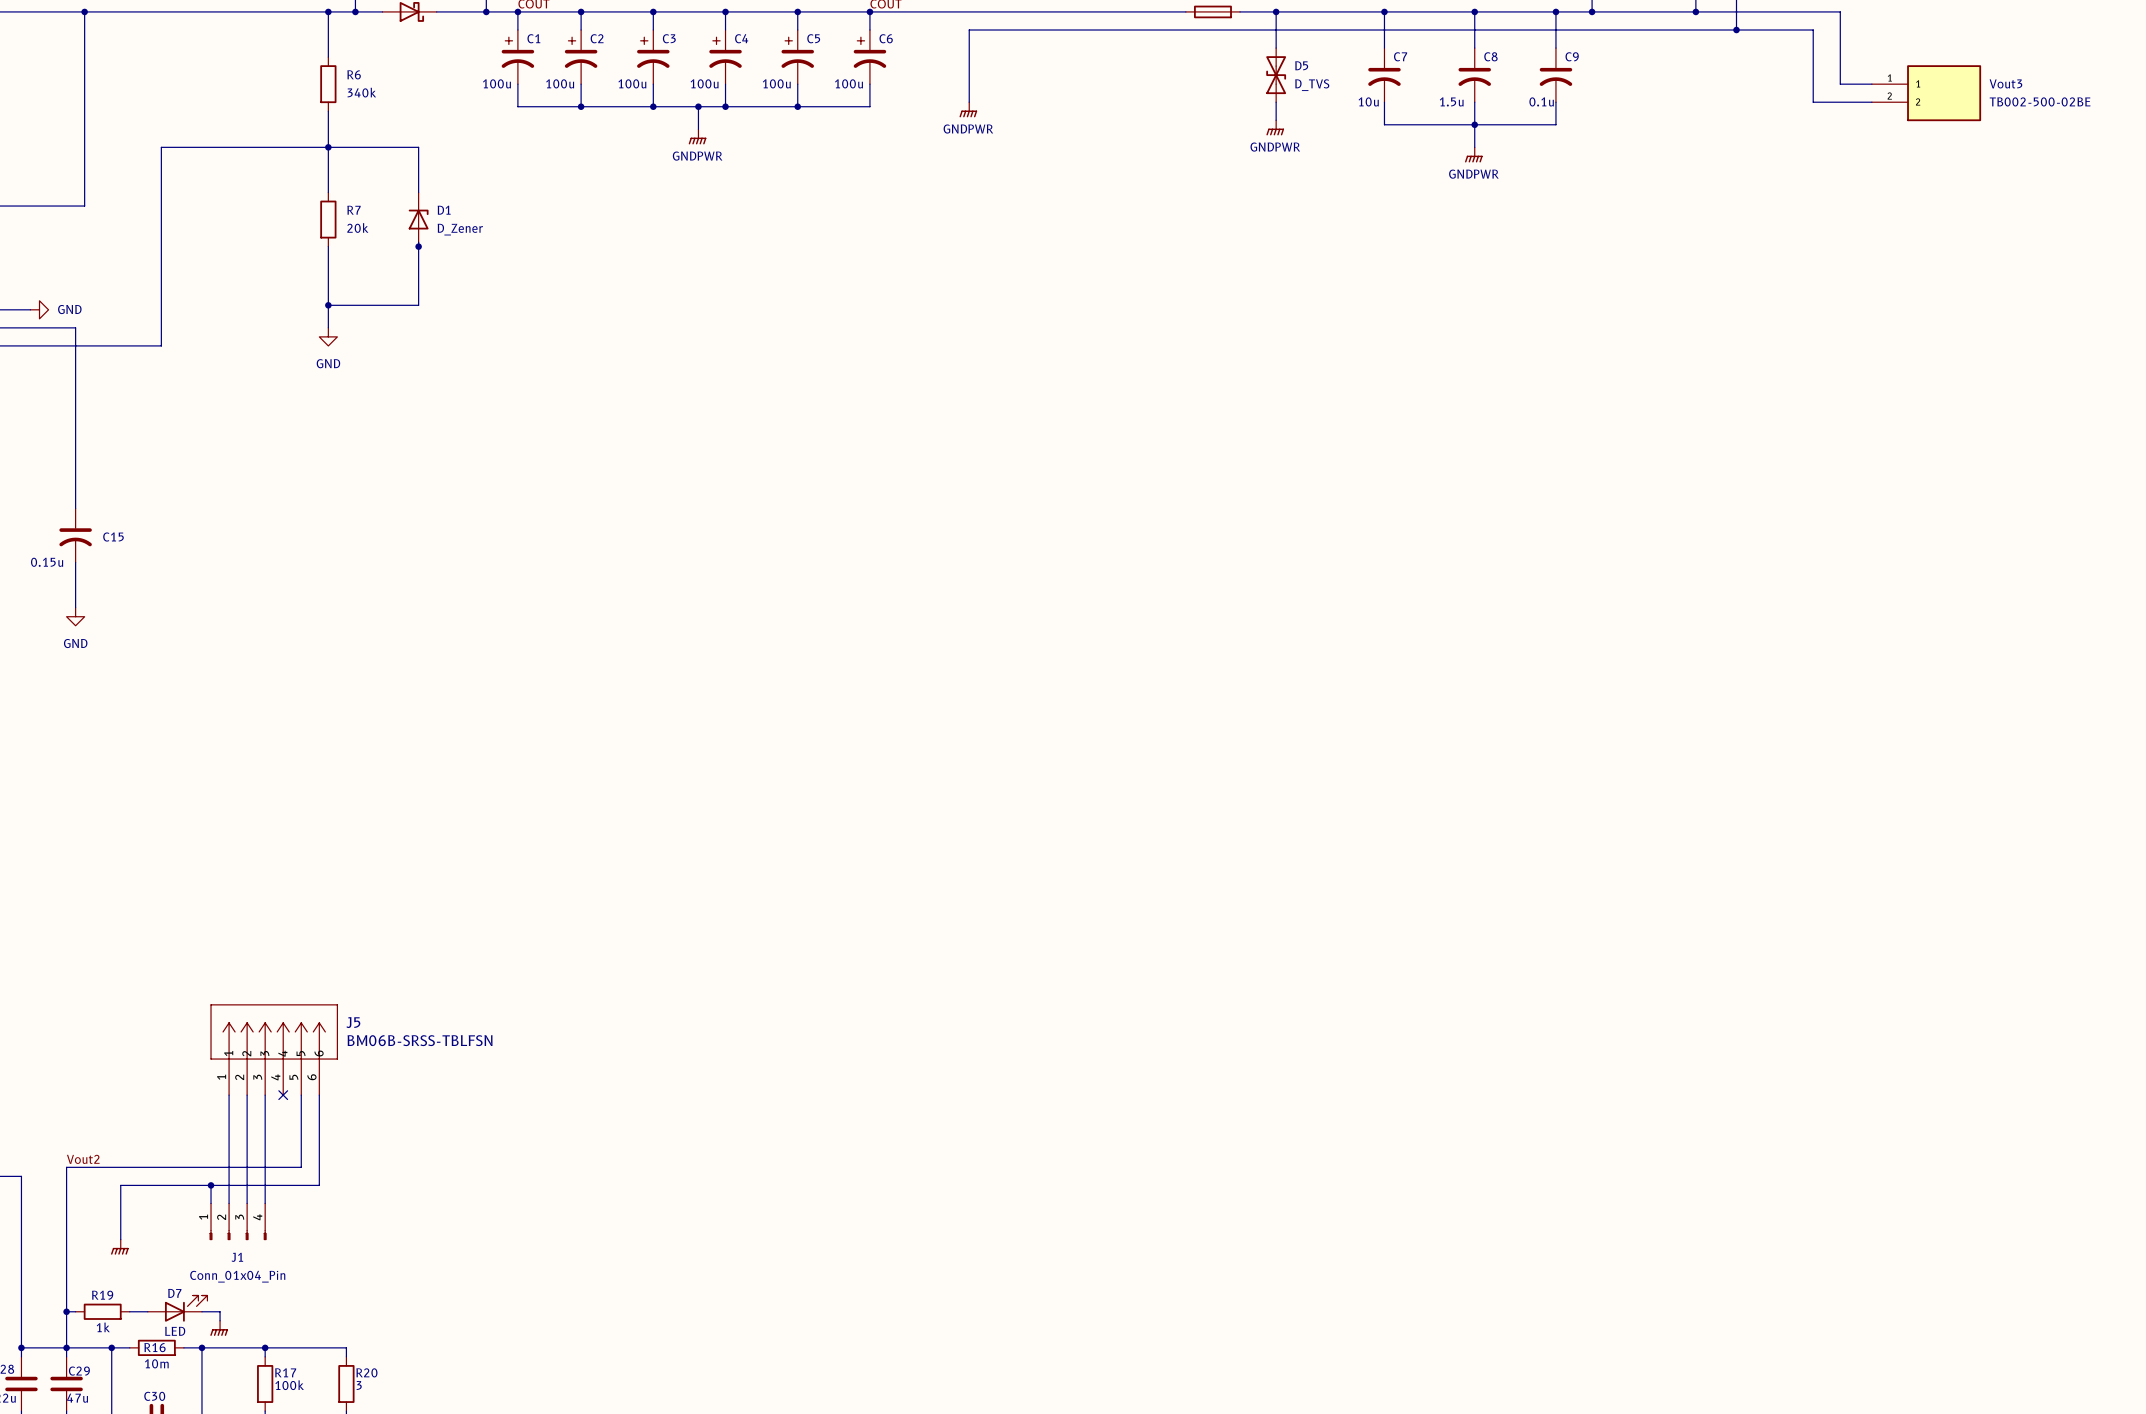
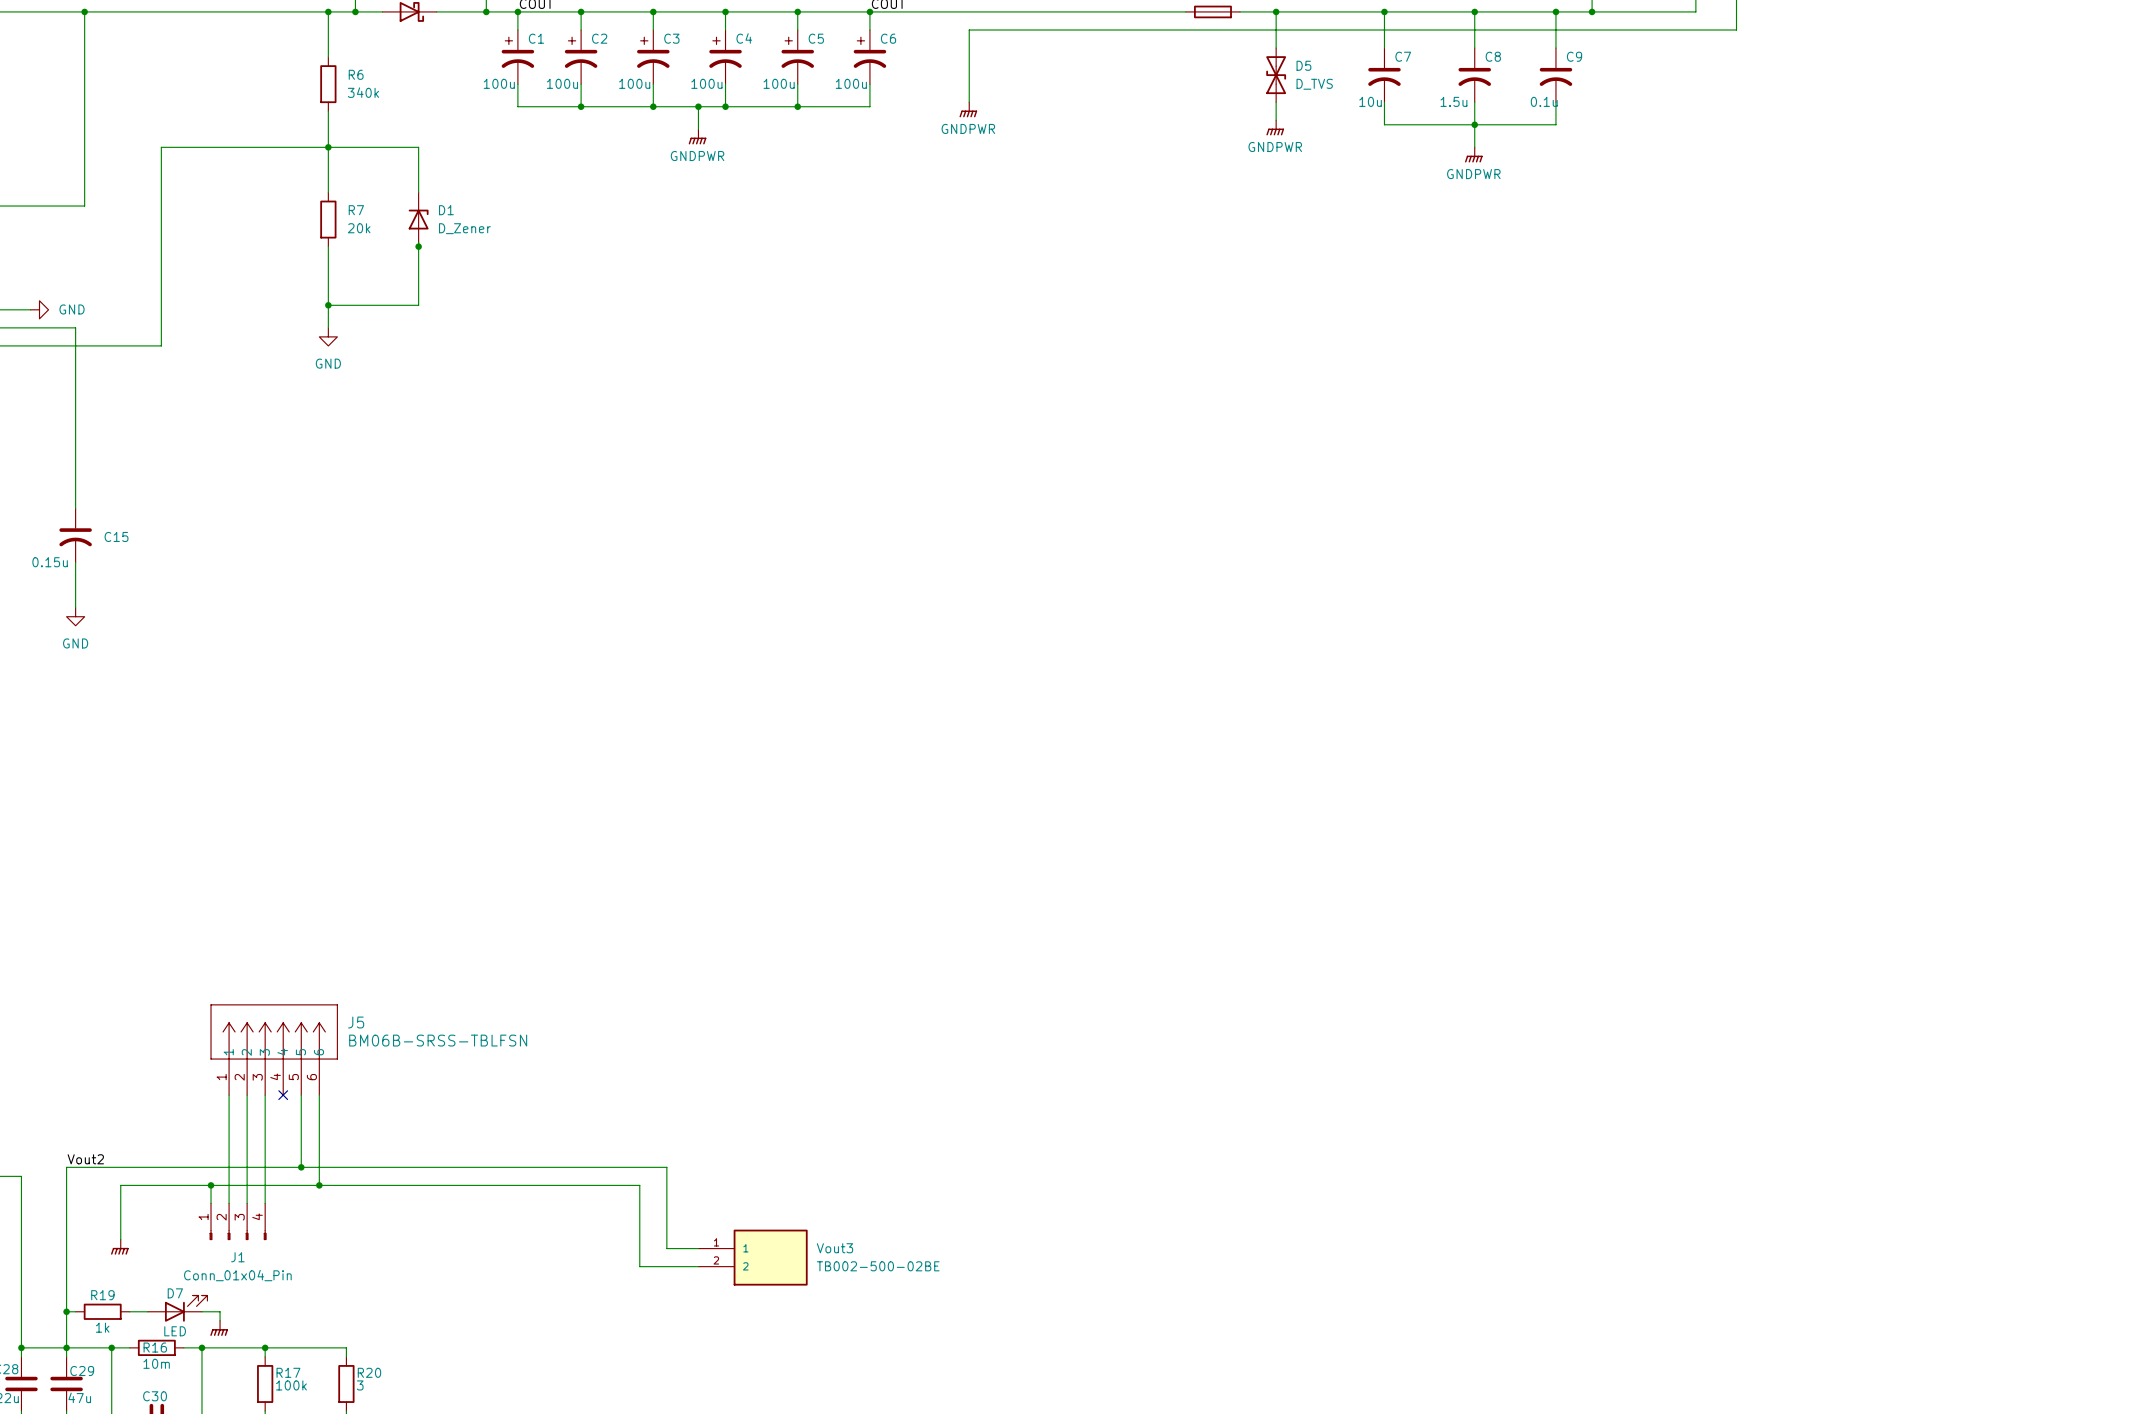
wire: (1695, 11) (1840, 11) (1840, 84) (1871, 84) -> none
junction: (1695, 11) -> none
wire: (1736, 30) (1813, 30) (1813, 102) (1871, 102) -> none
junction: (1736, 30) -> none
Vout3 position: (1926, 93) -> (753, 1257)
wire: none -> (301, 1167) (666, 1167) (666, 1248) (698, 1248)
junction: none -> (301, 1167)
wire: none -> (319, 1185) (639, 1185) (639, 1266) (698, 1266)
junction: none -> (319, 1185)

